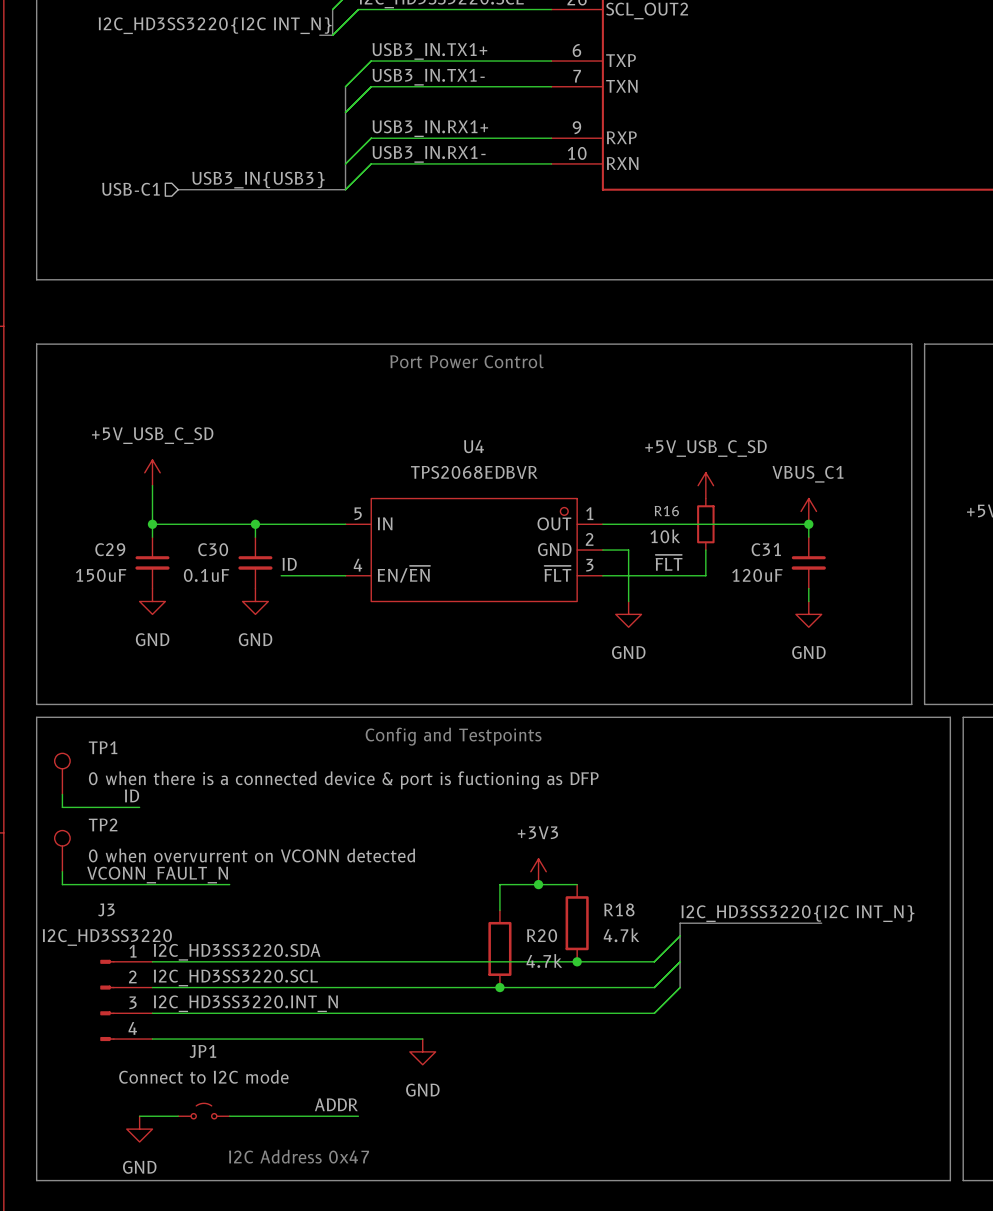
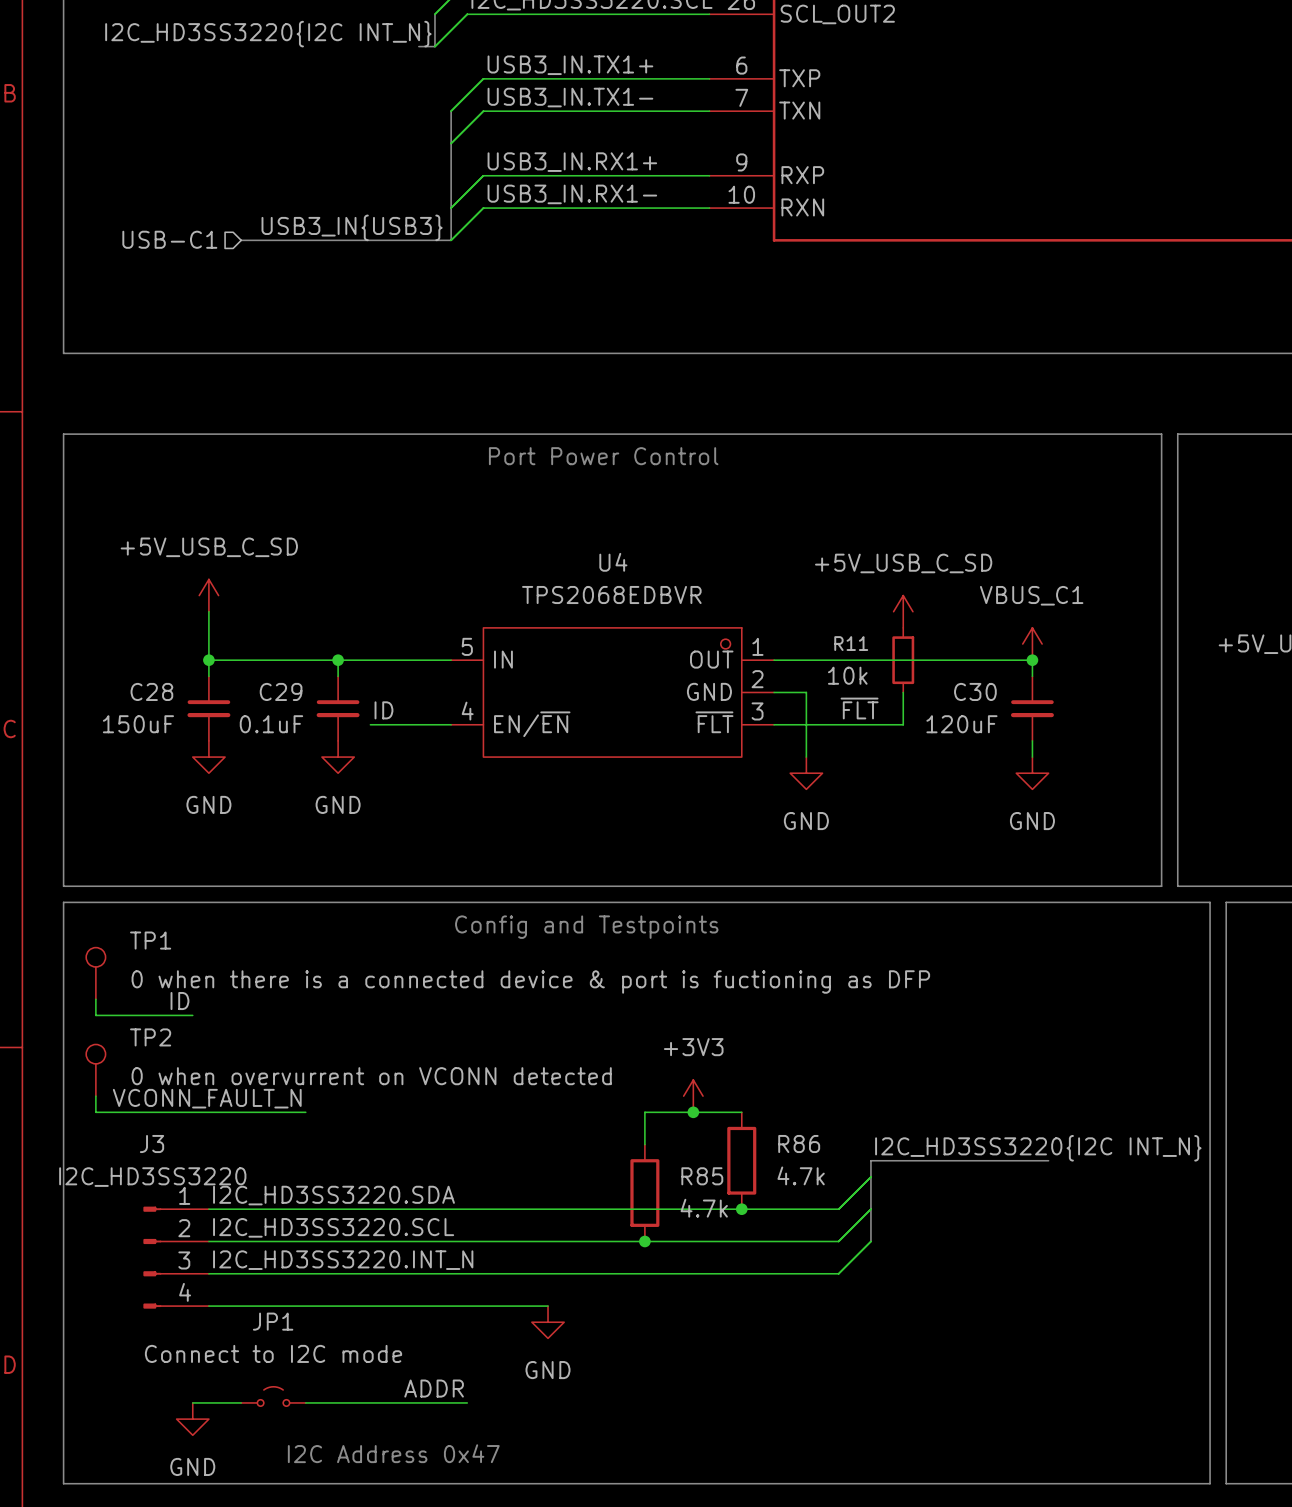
R16 name: R16 (666, 511) -> R11 (851, 643)
C29 name: C29 (110, 549) -> C28 (151, 691)
C30 name: C30 (213, 549) -> C29 (281, 691)
C31 name: C31 (766, 549) -> C30 (975, 691)
R18 name: R18 (619, 909) -> R86 (799, 1144)
R20 name: R20 (542, 935) -> R85 (702, 1176)

